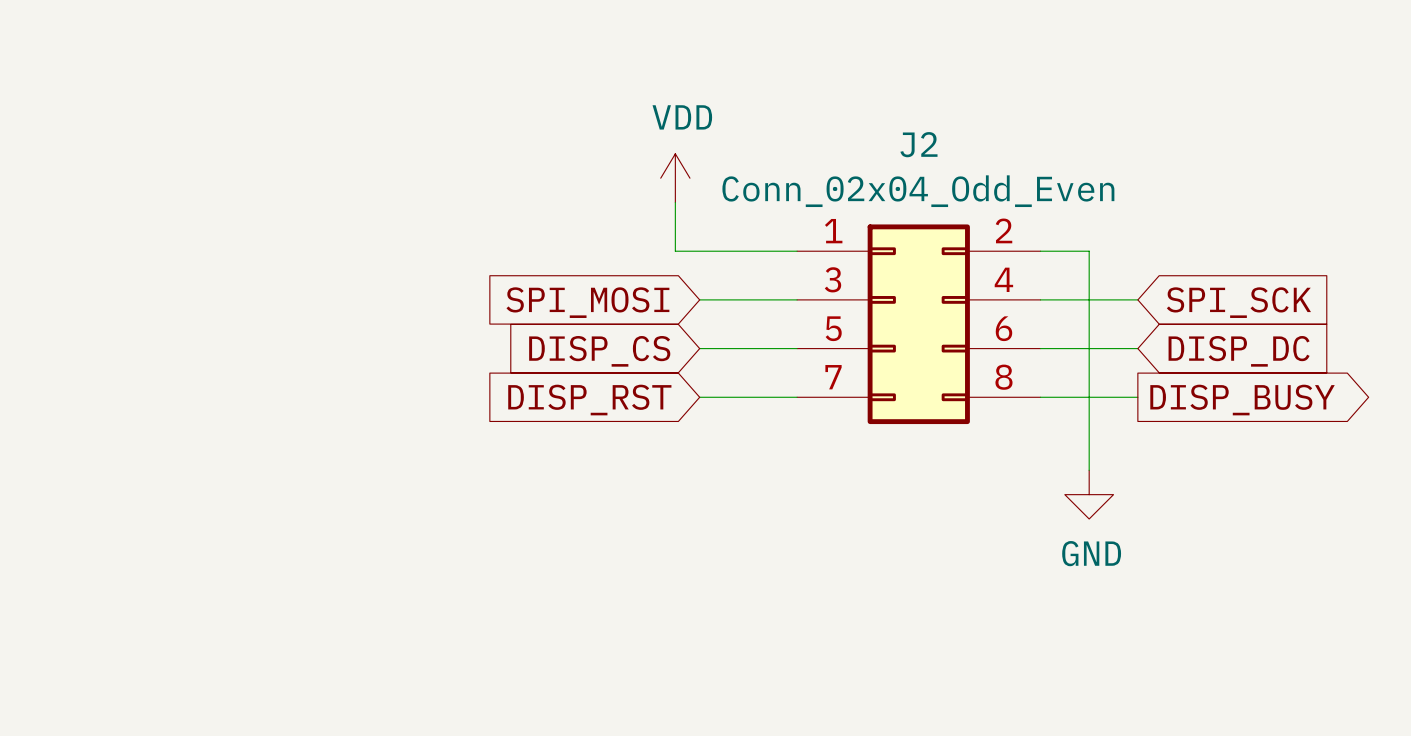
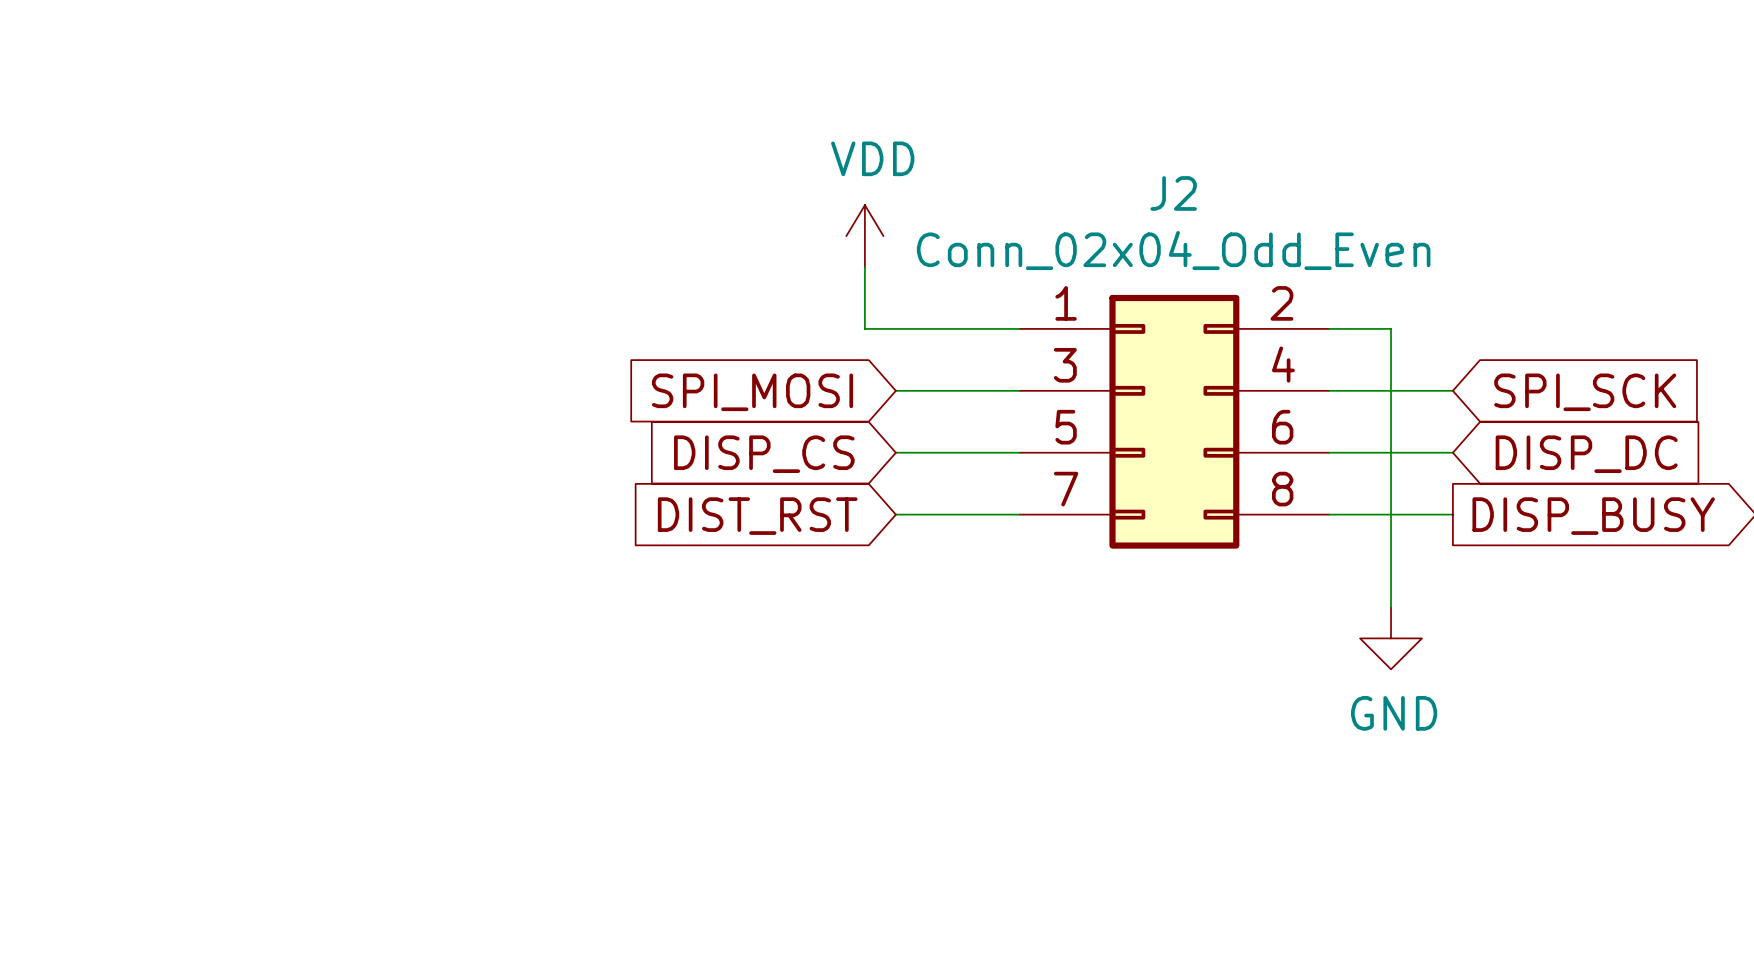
global label: DISP_RST (589, 400) -> DIST_RST (757, 516)

